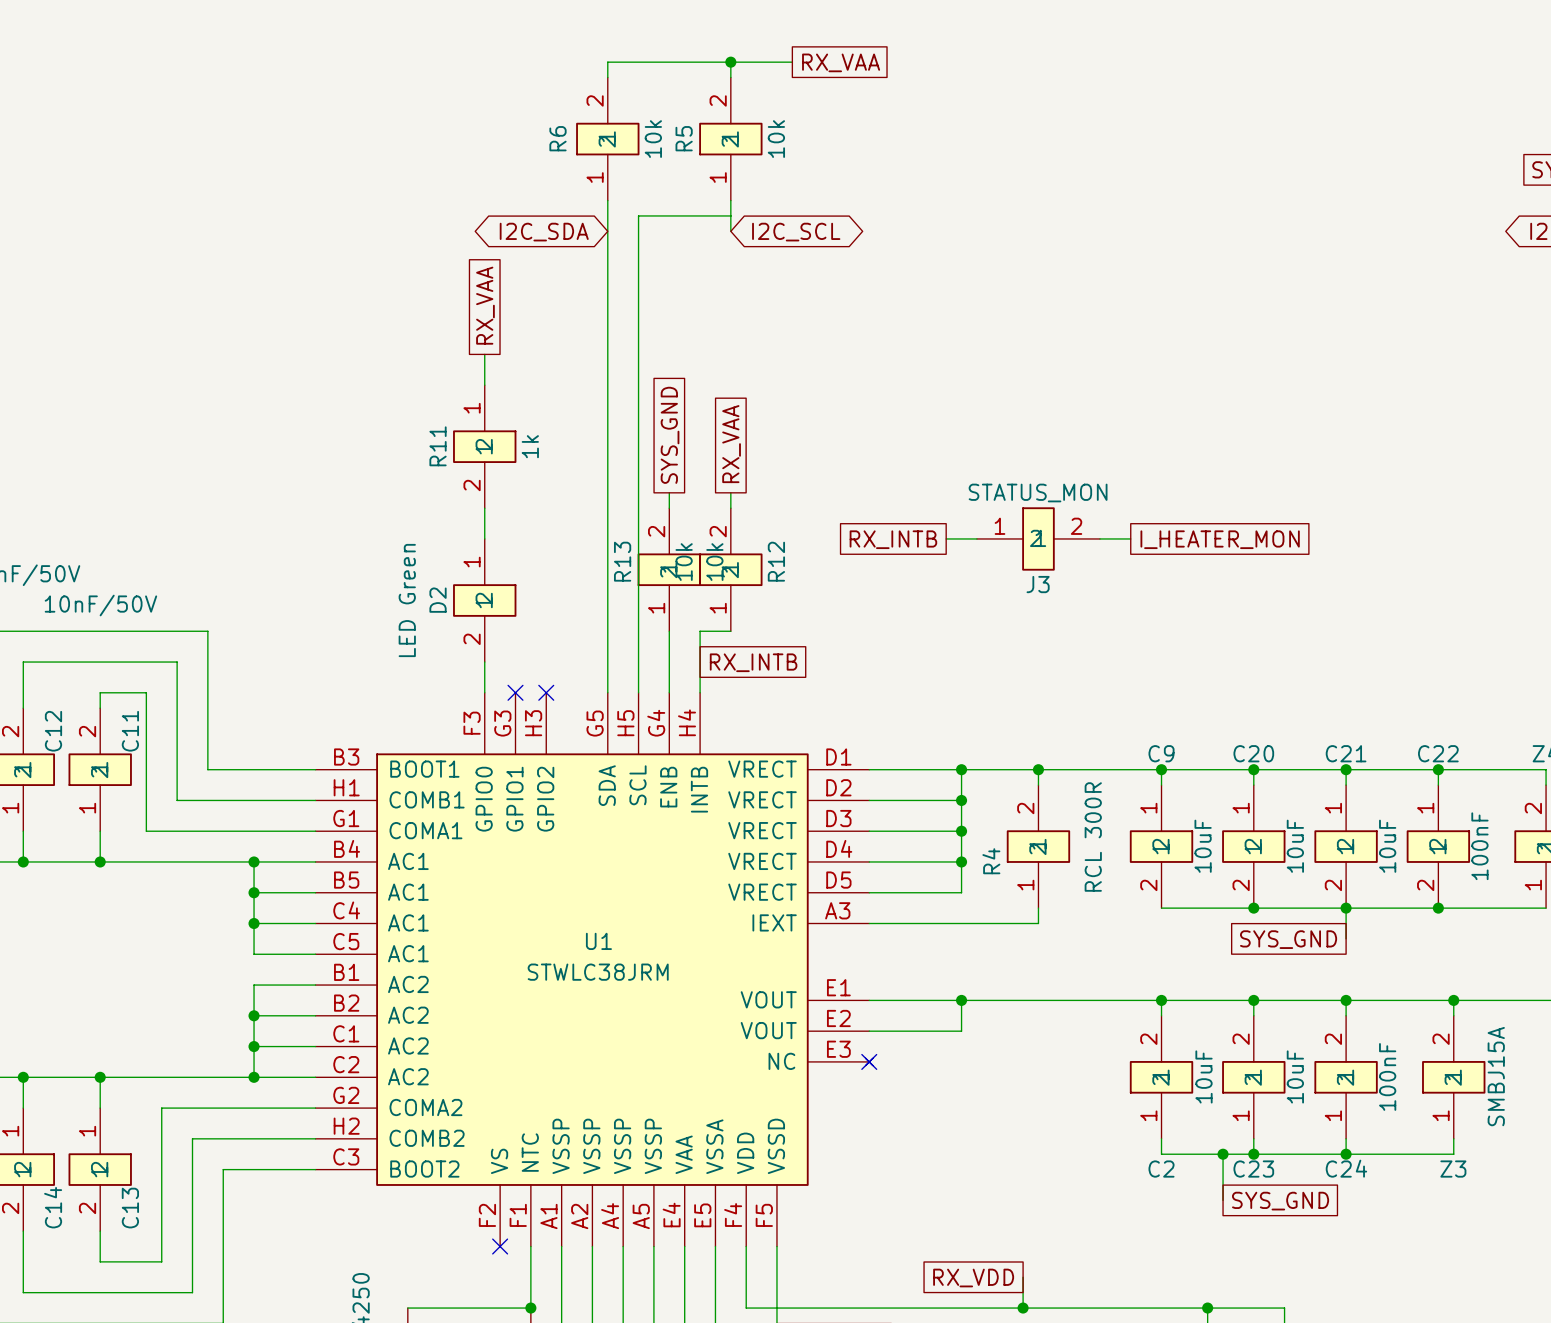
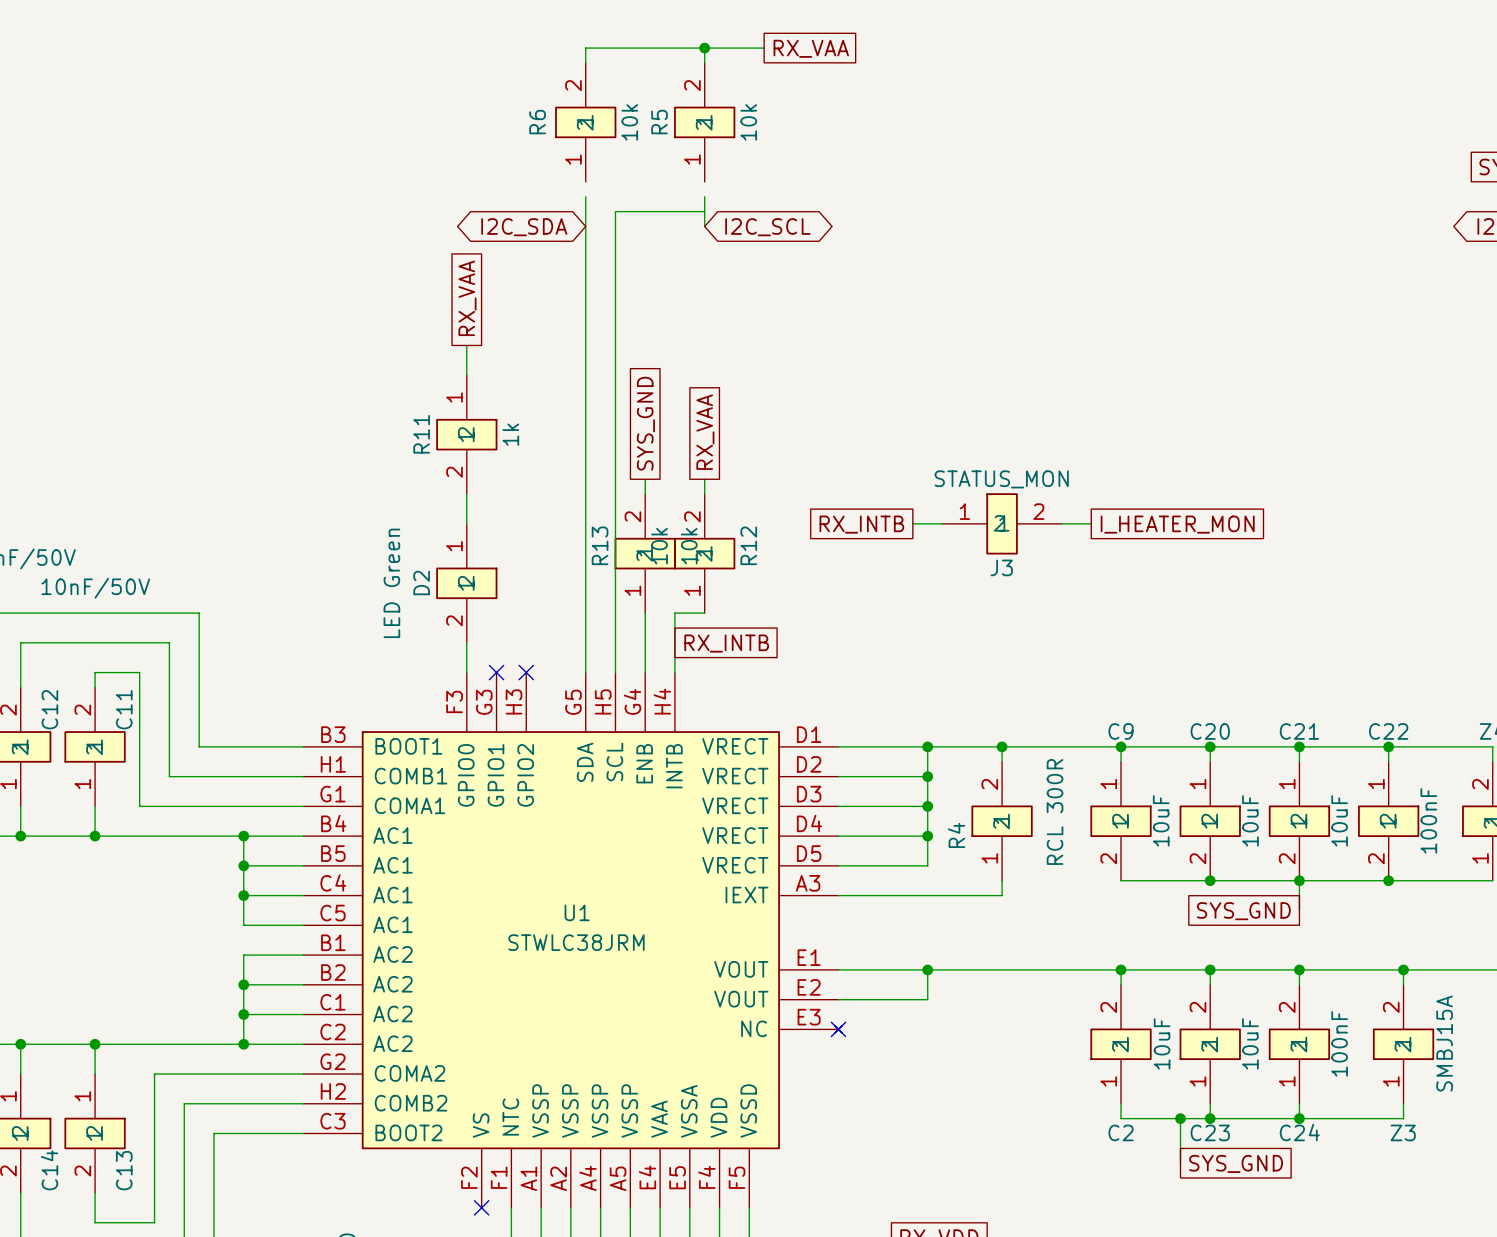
junction position: (730, 62) -> (704, 48)
wire: (792, 62) (607, 62) (607, 77) -> (764, 48) (585, 48) (585, 62)
global label position: RX_VAA (841, 62) -> RX_VAA (811, 48)
R6 position: (607, 139) -> (585, 122)
R5 position: (730, 139) -> (704, 122)

